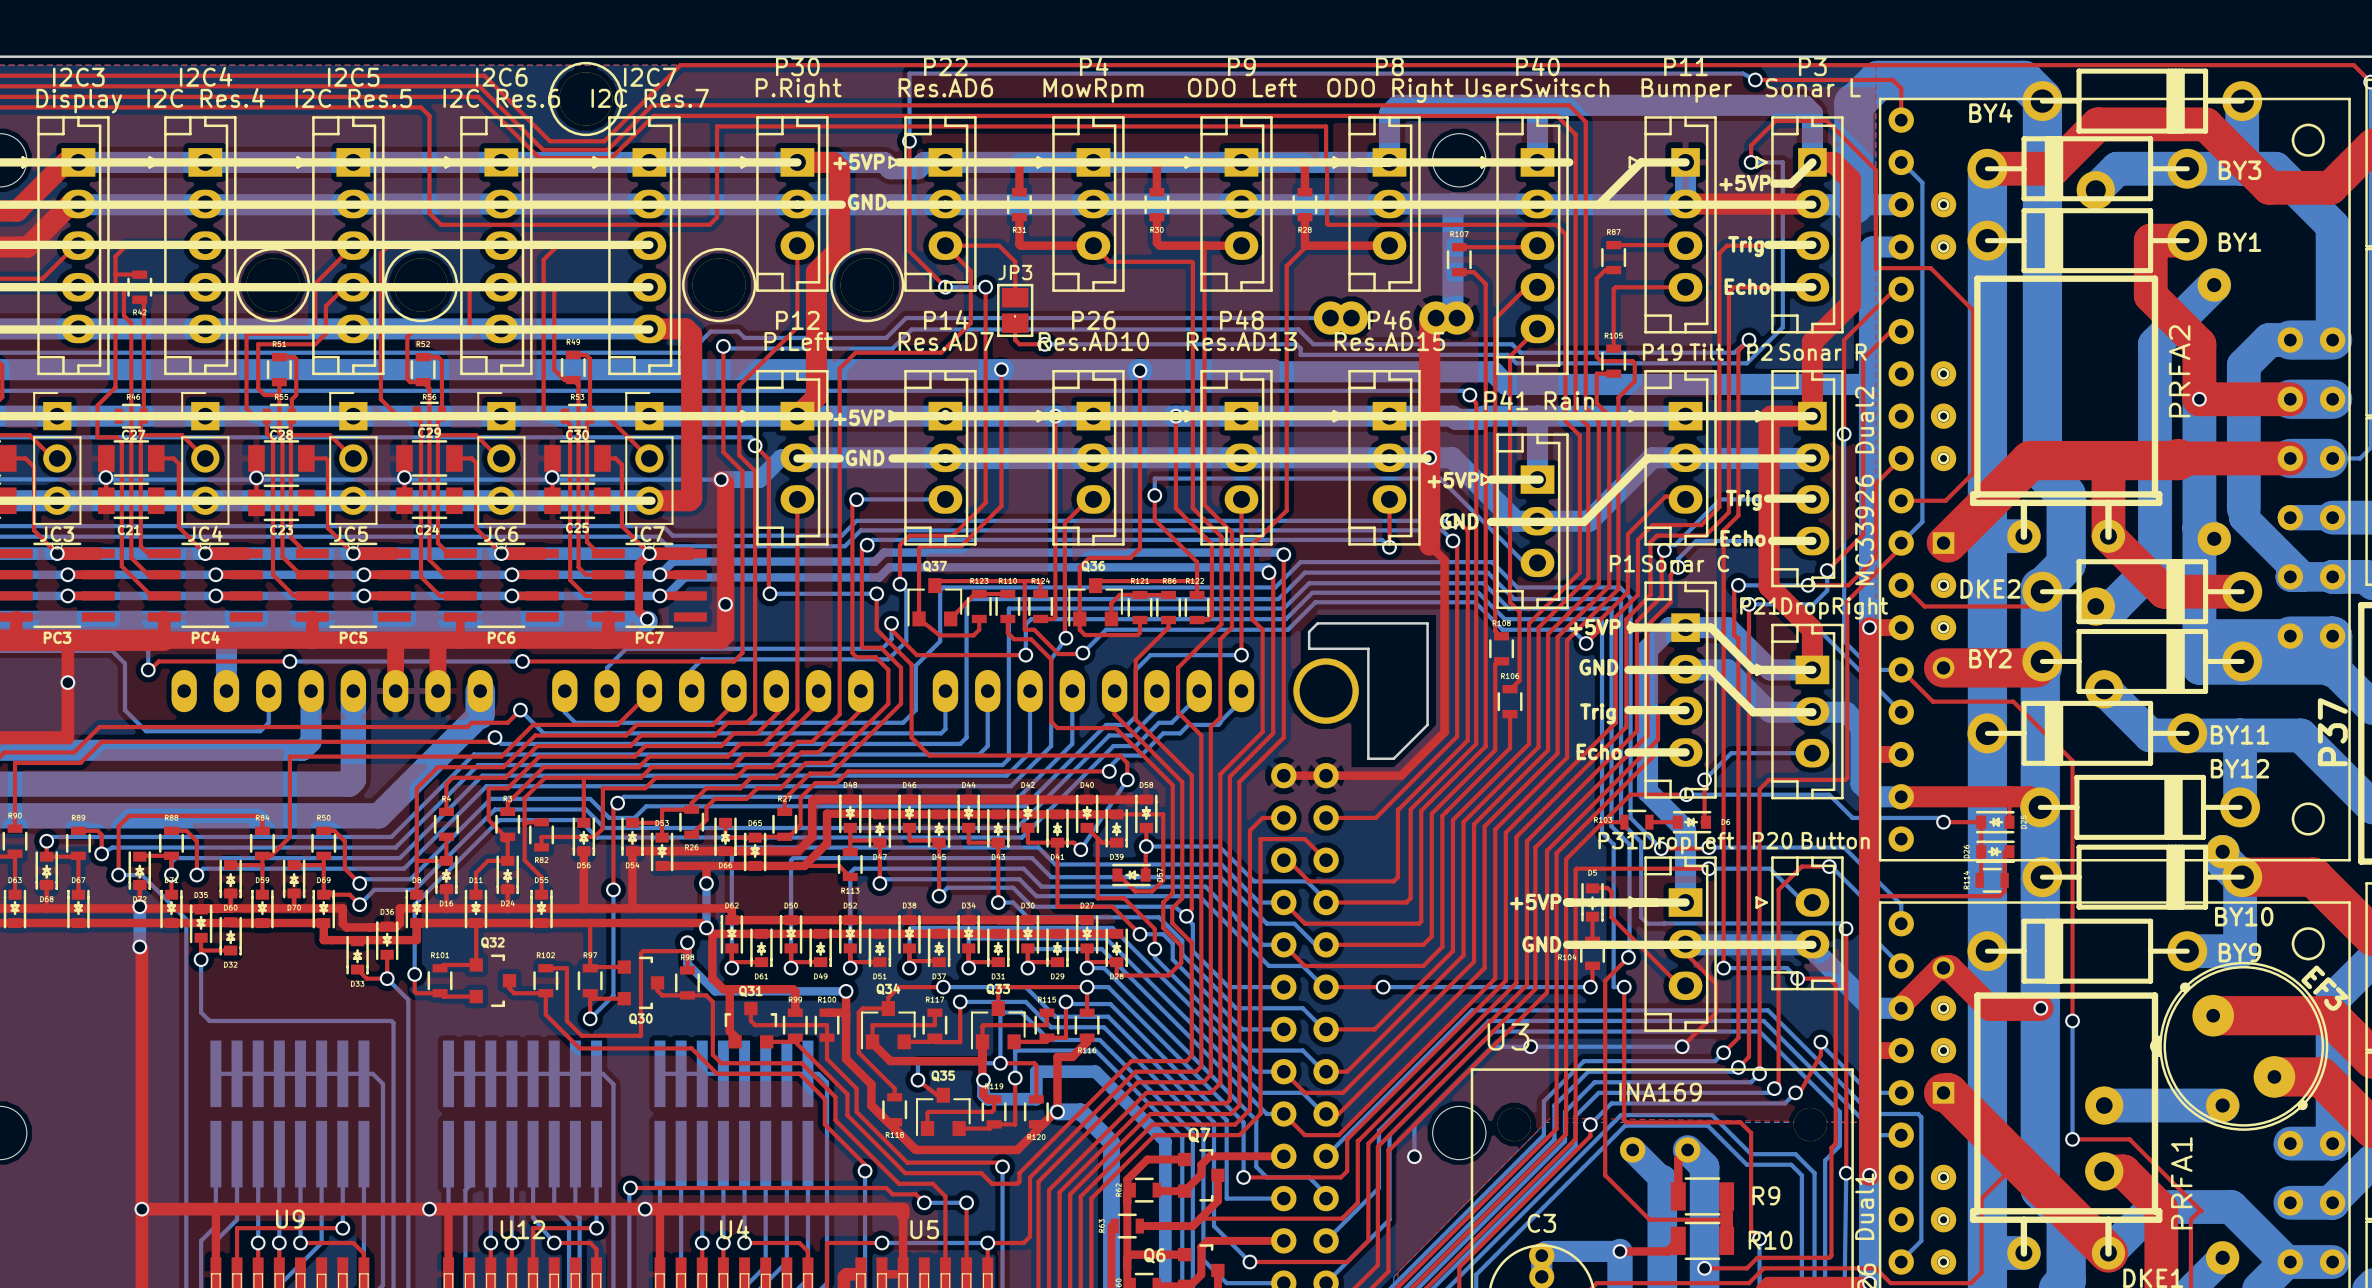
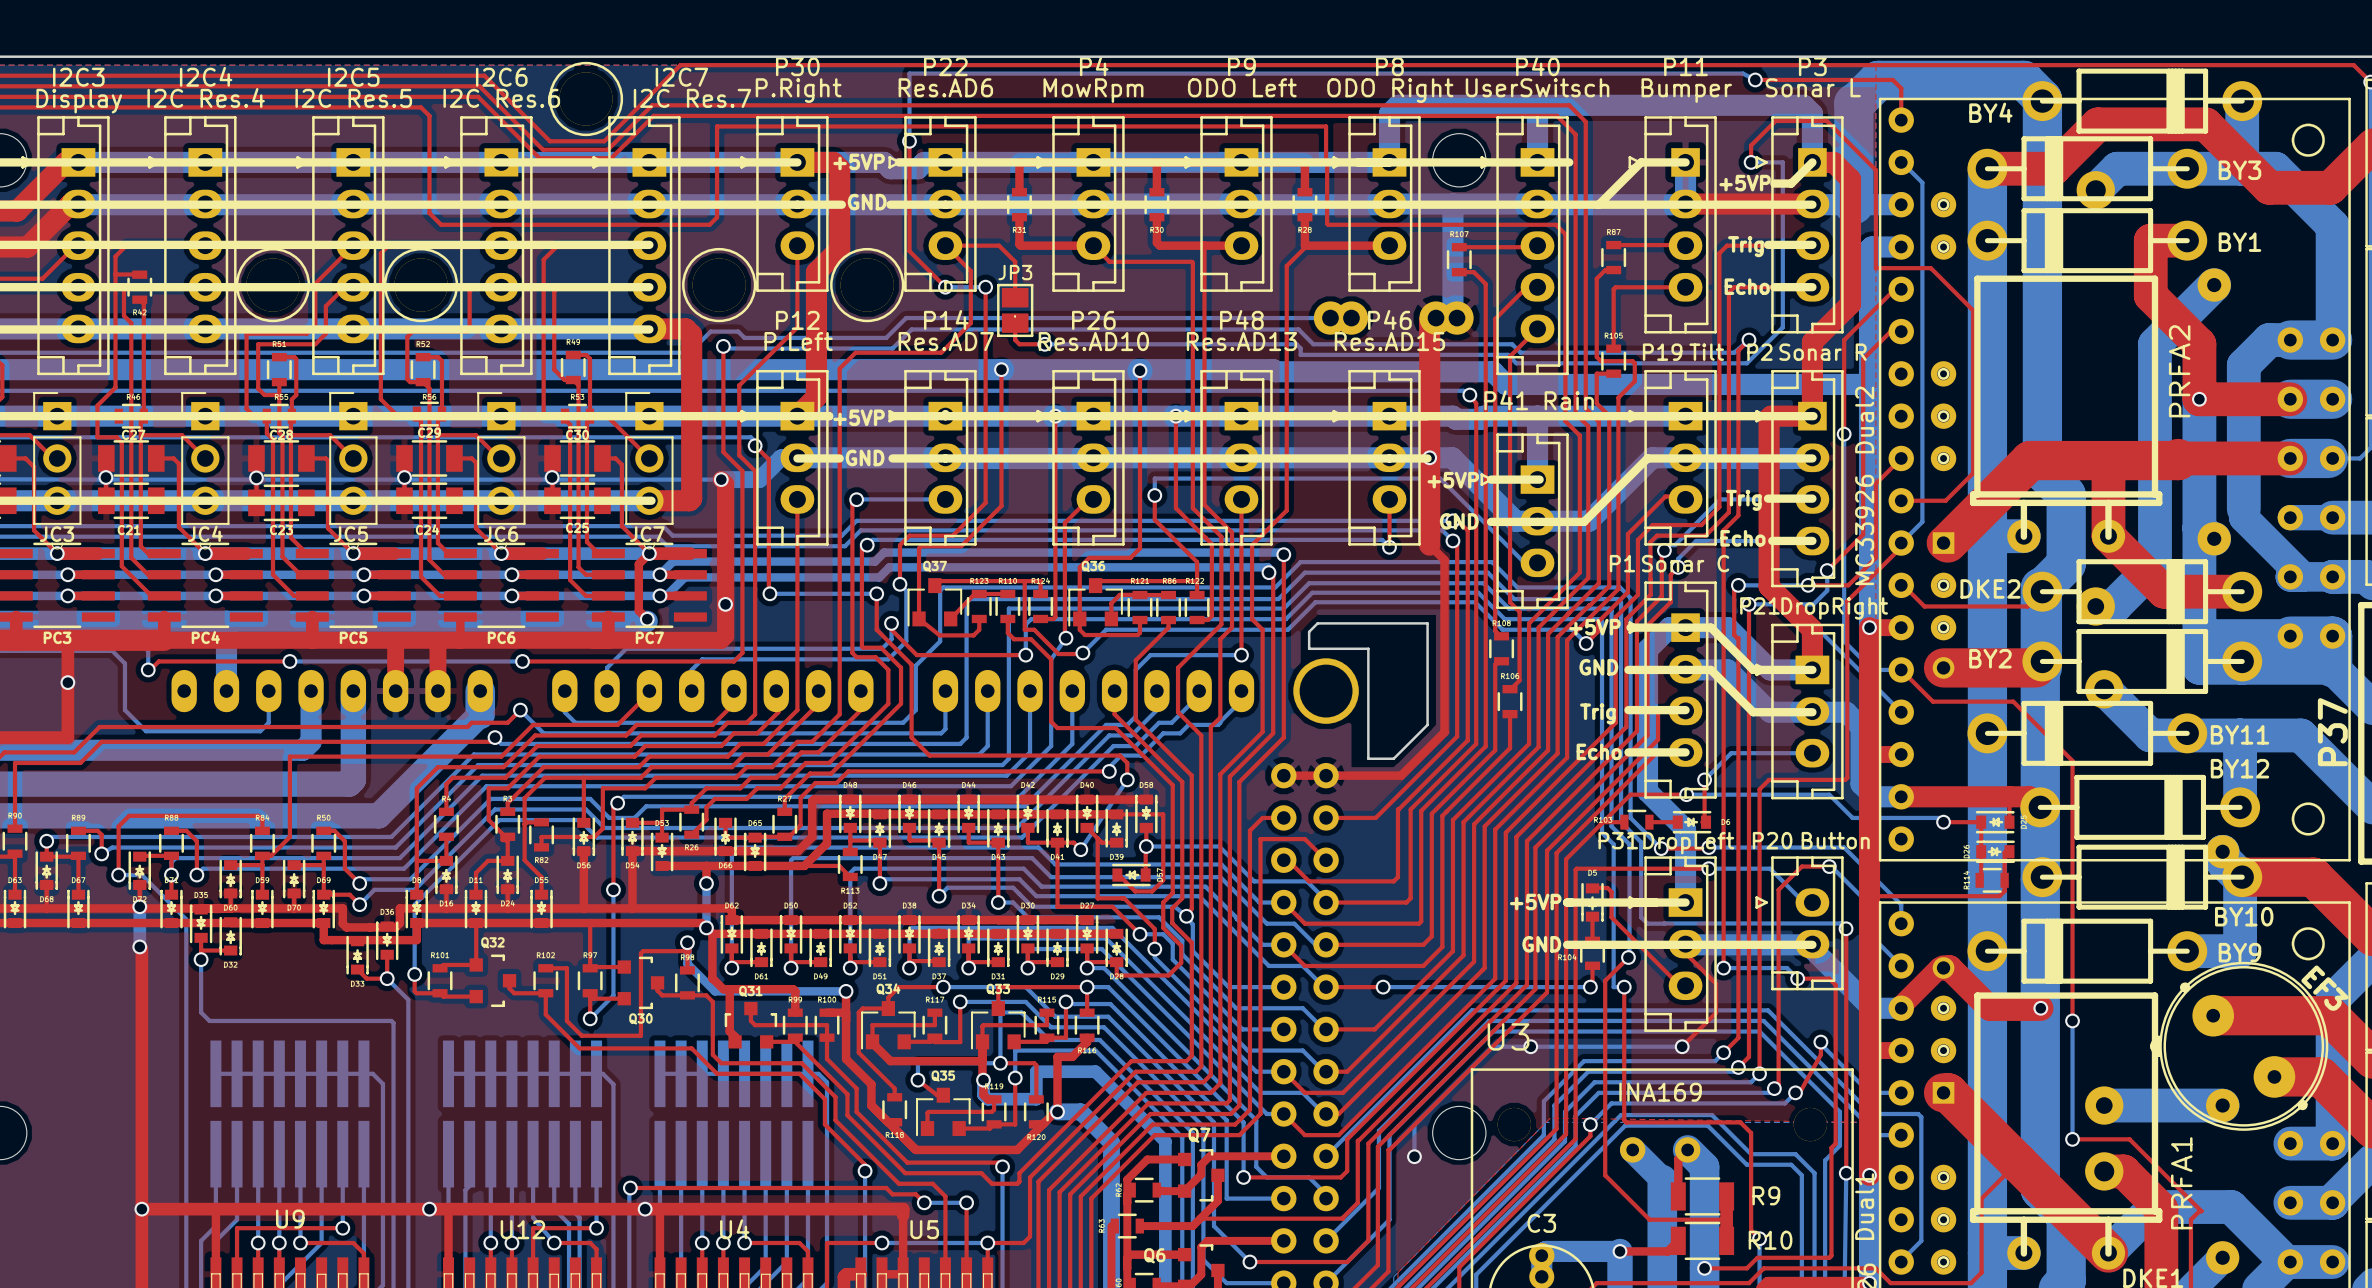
I2C7 name position: I2C7 (650, 77) -> I2C7 (681, 77)
I2C7 value position: I2C Res.7 (650, 98) -> I2C Res.7 (692, 98)

